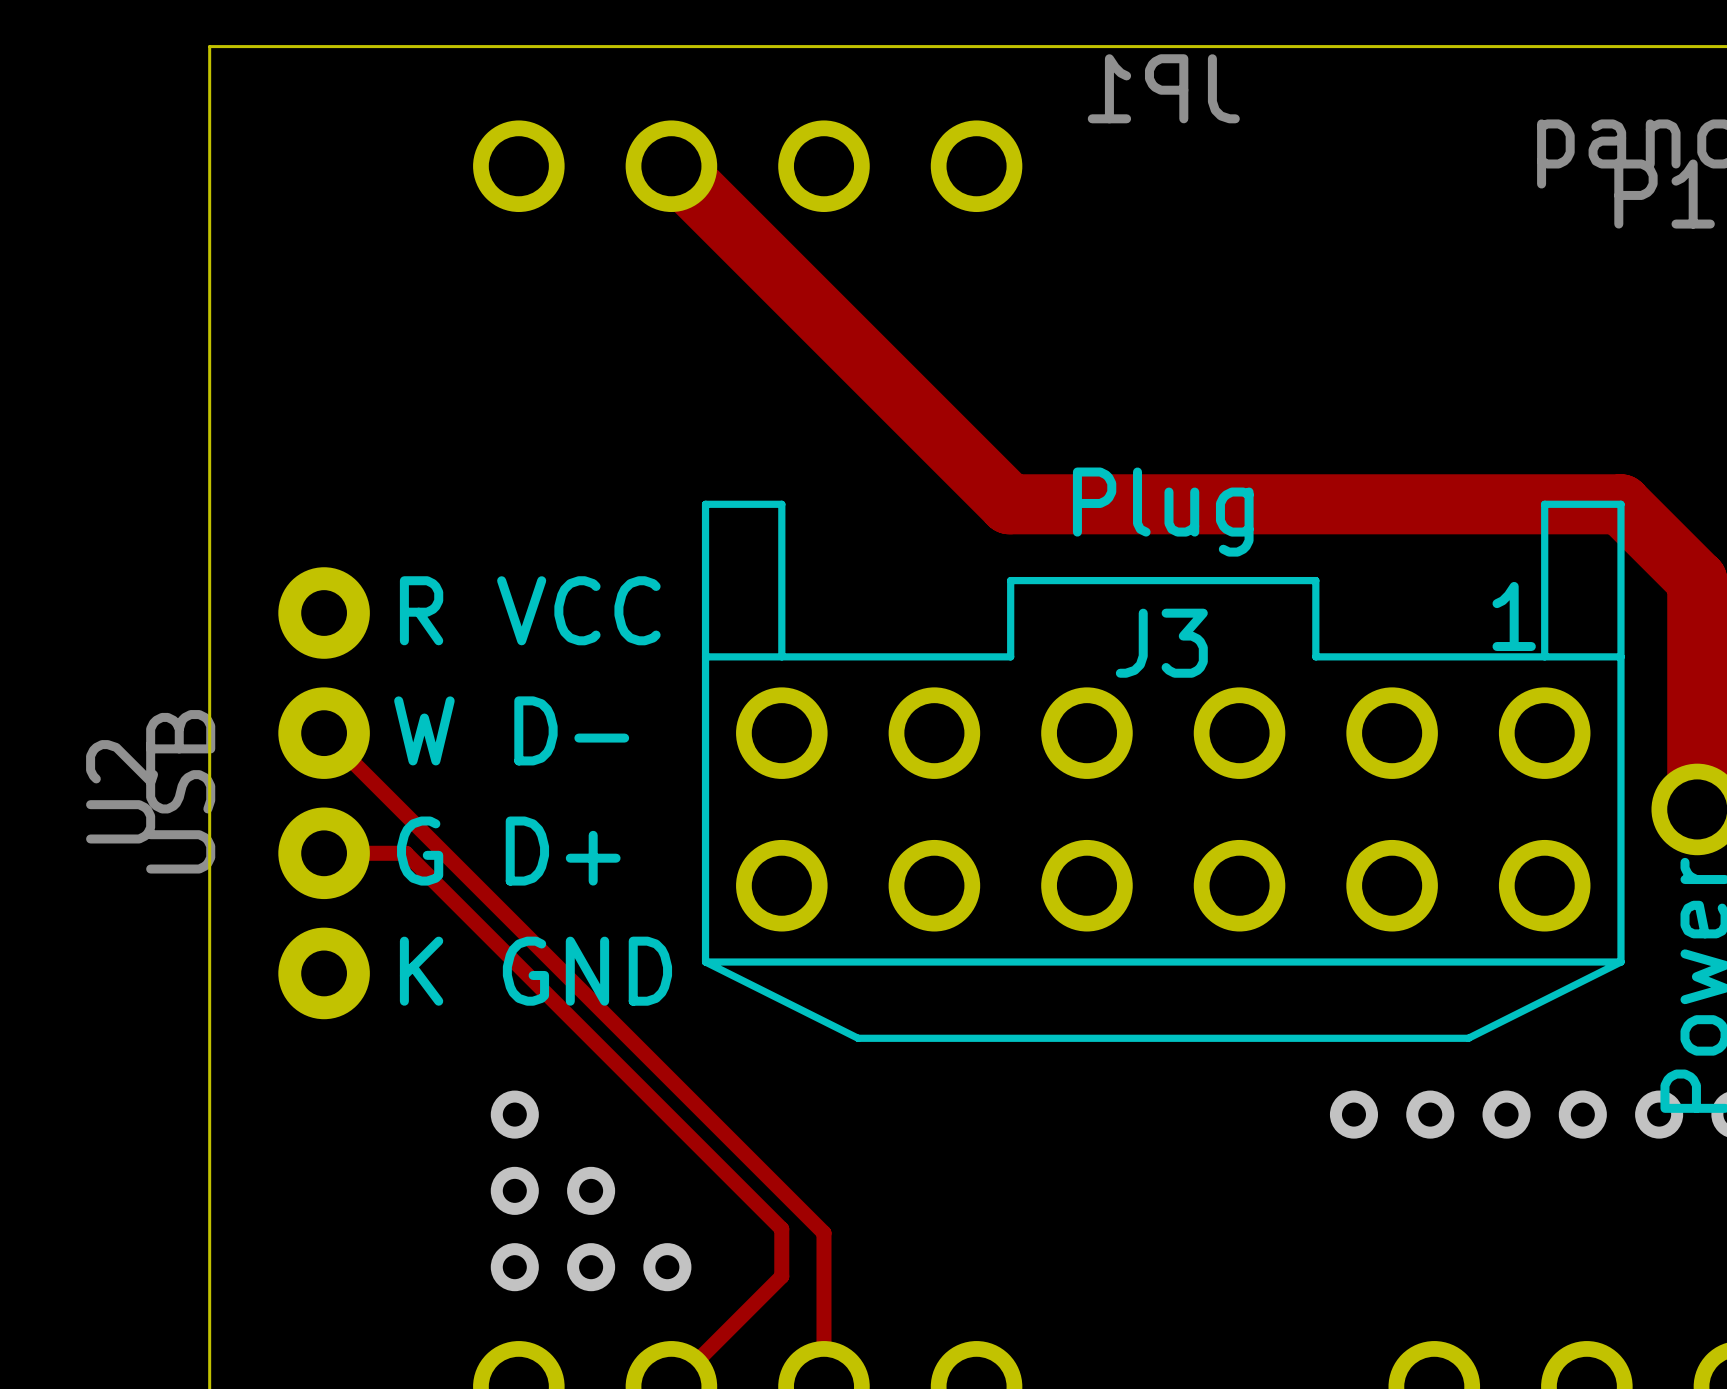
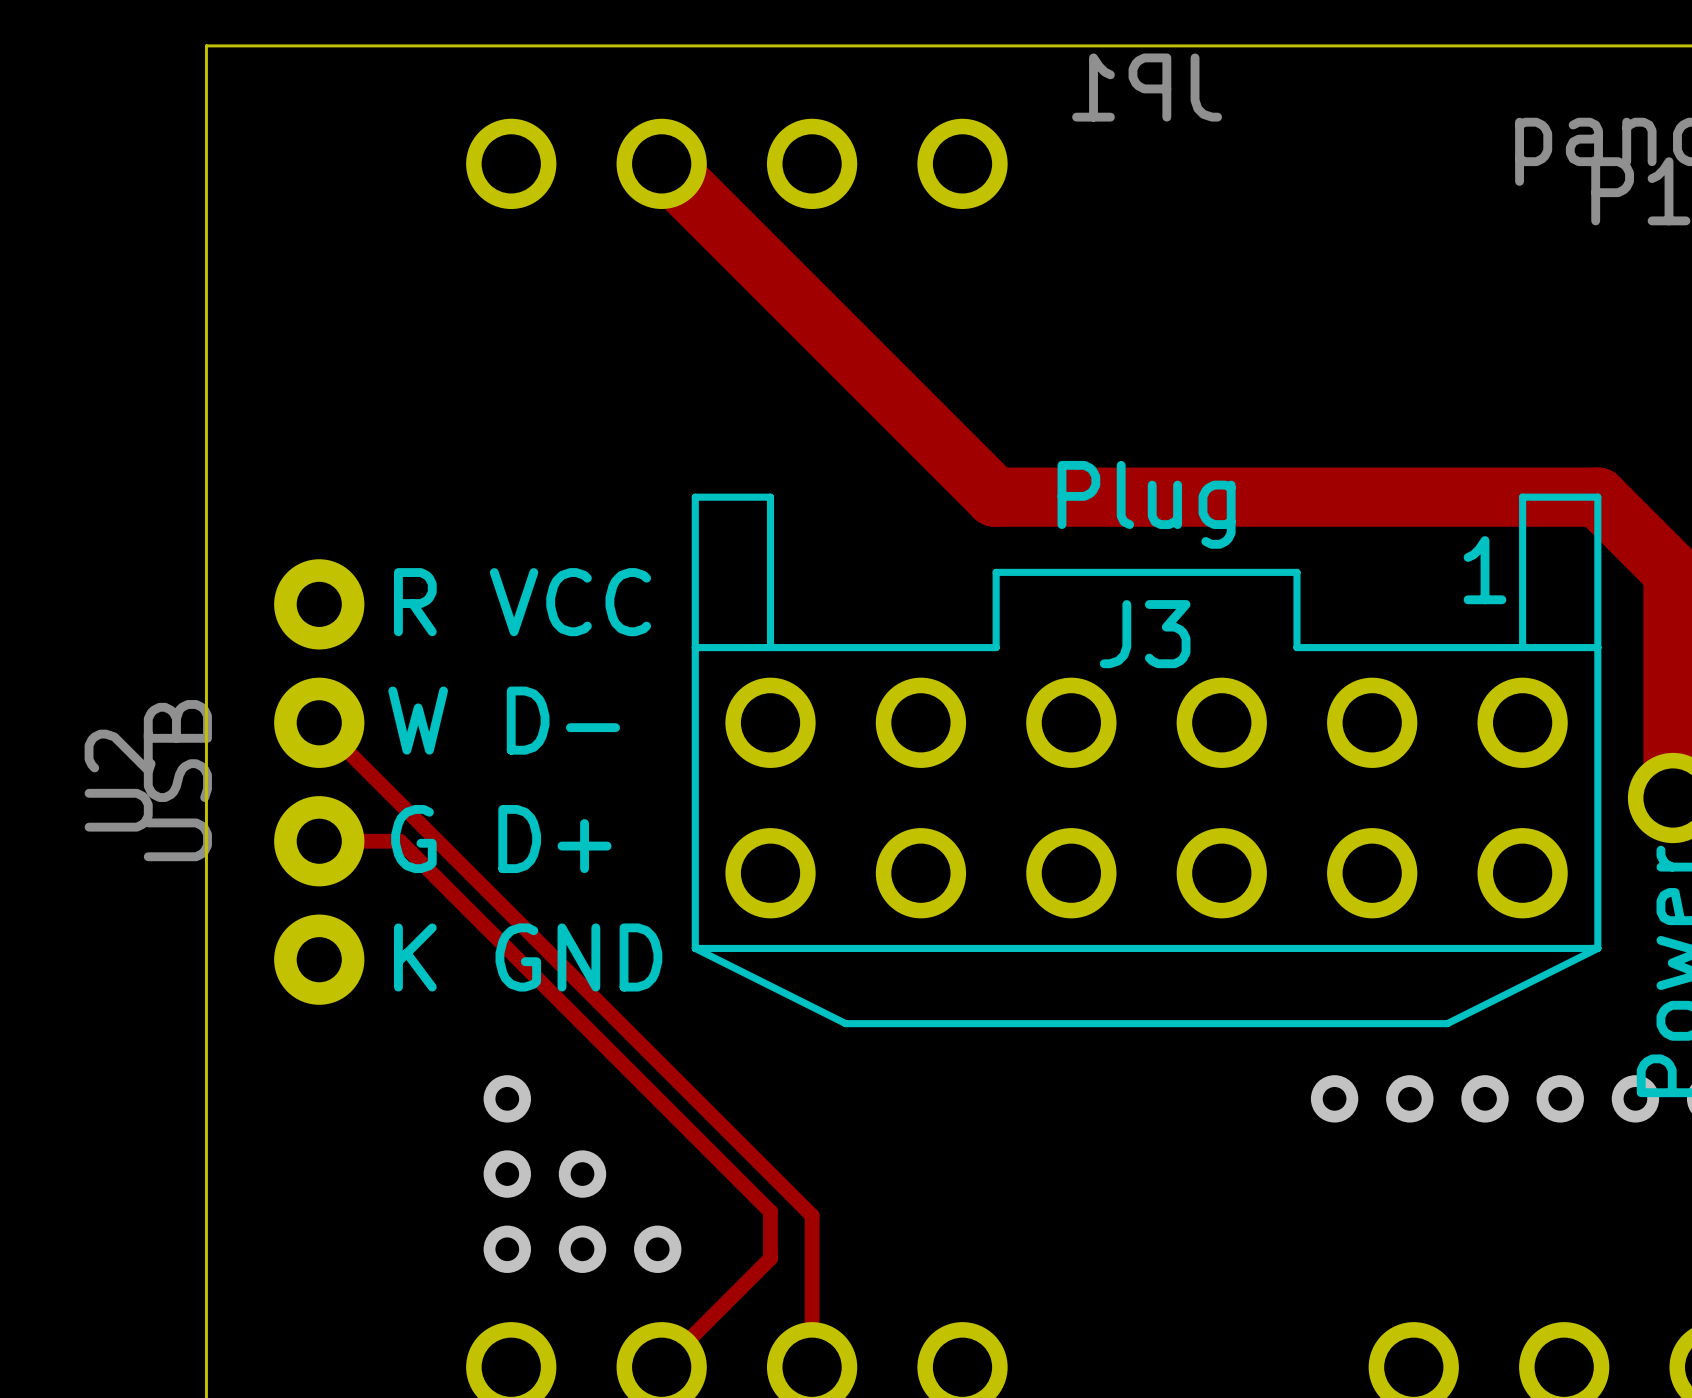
J3 text position: 1 (1514, 616) -> 1 (1485, 570)

